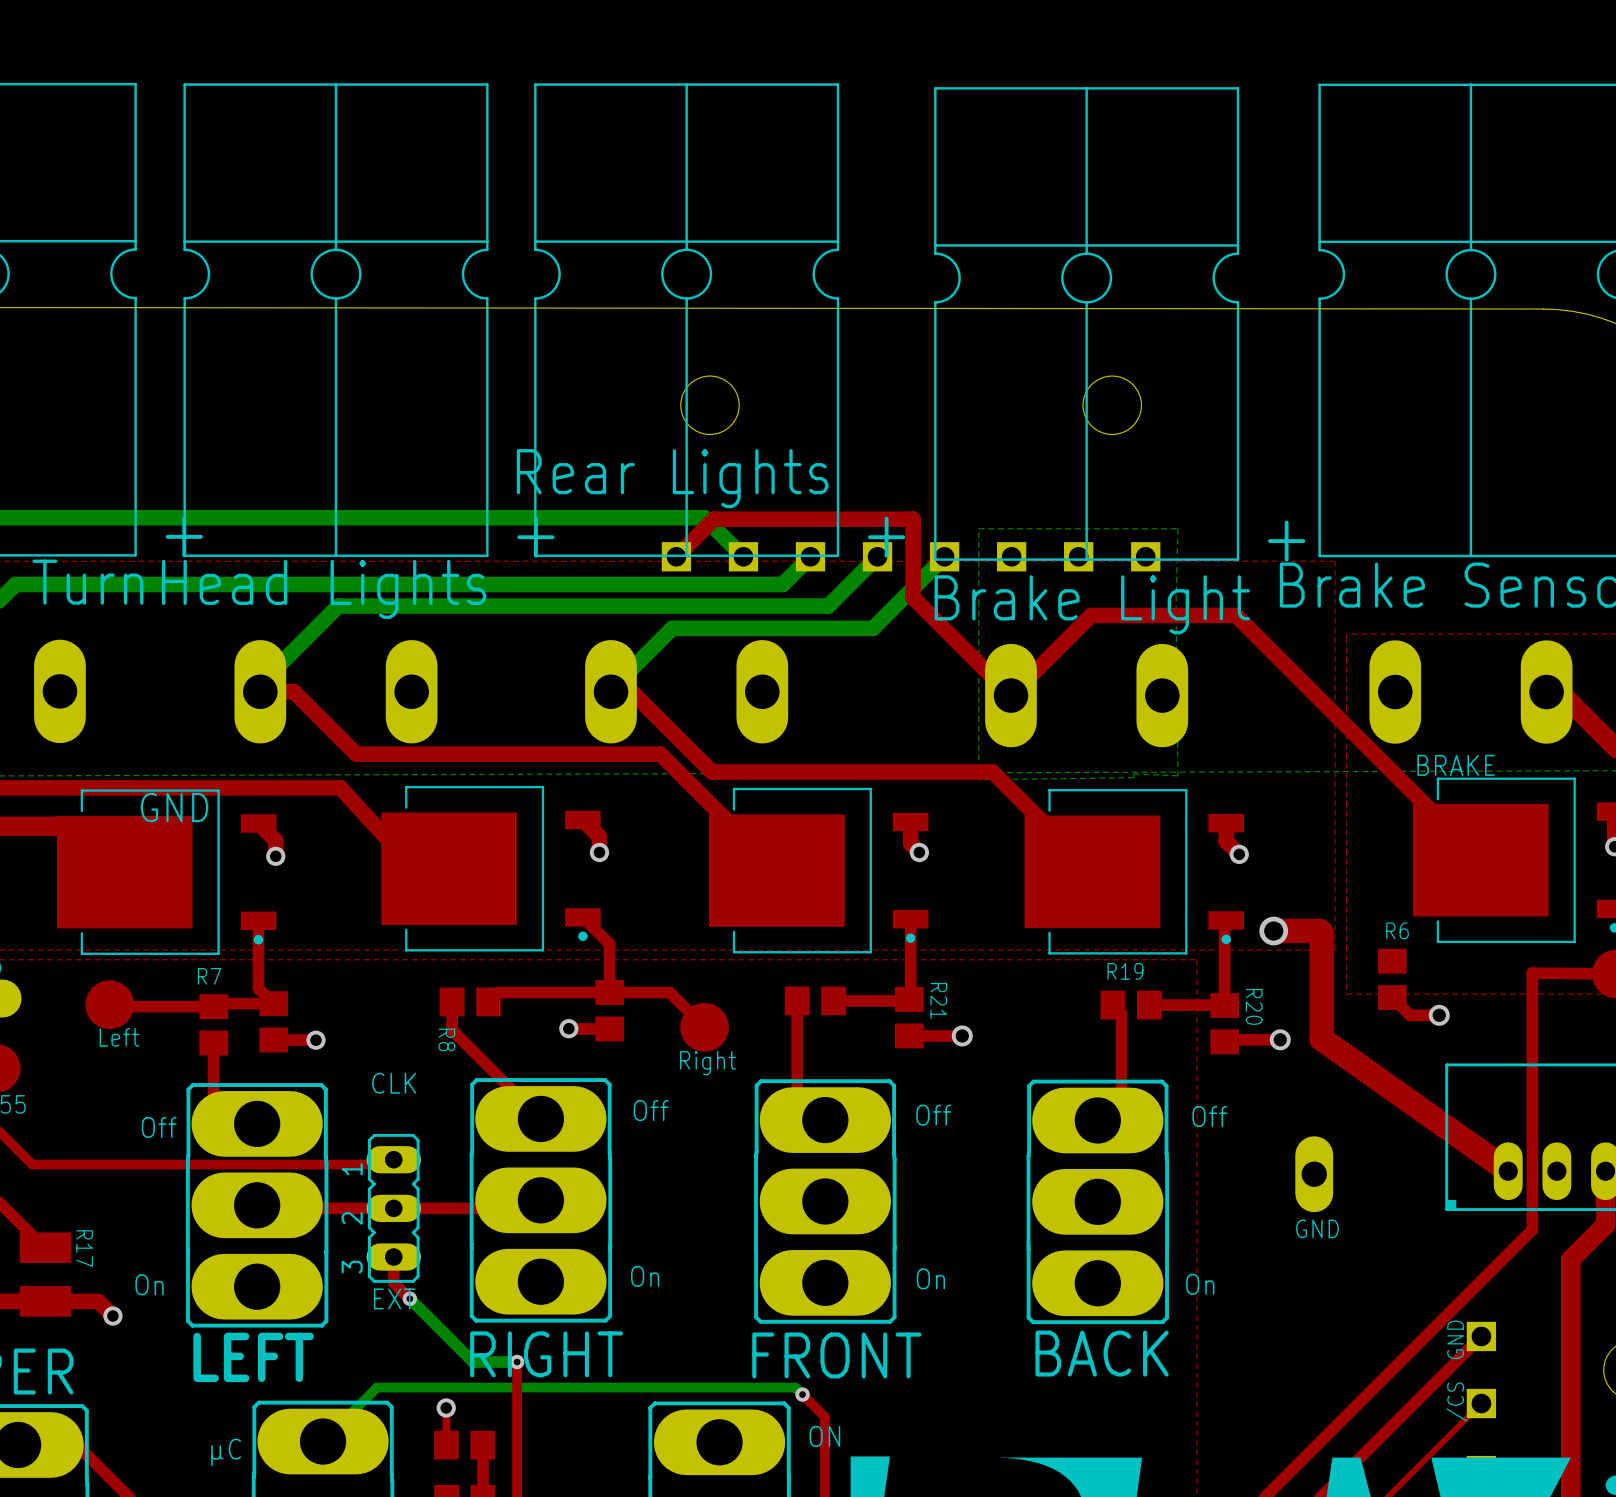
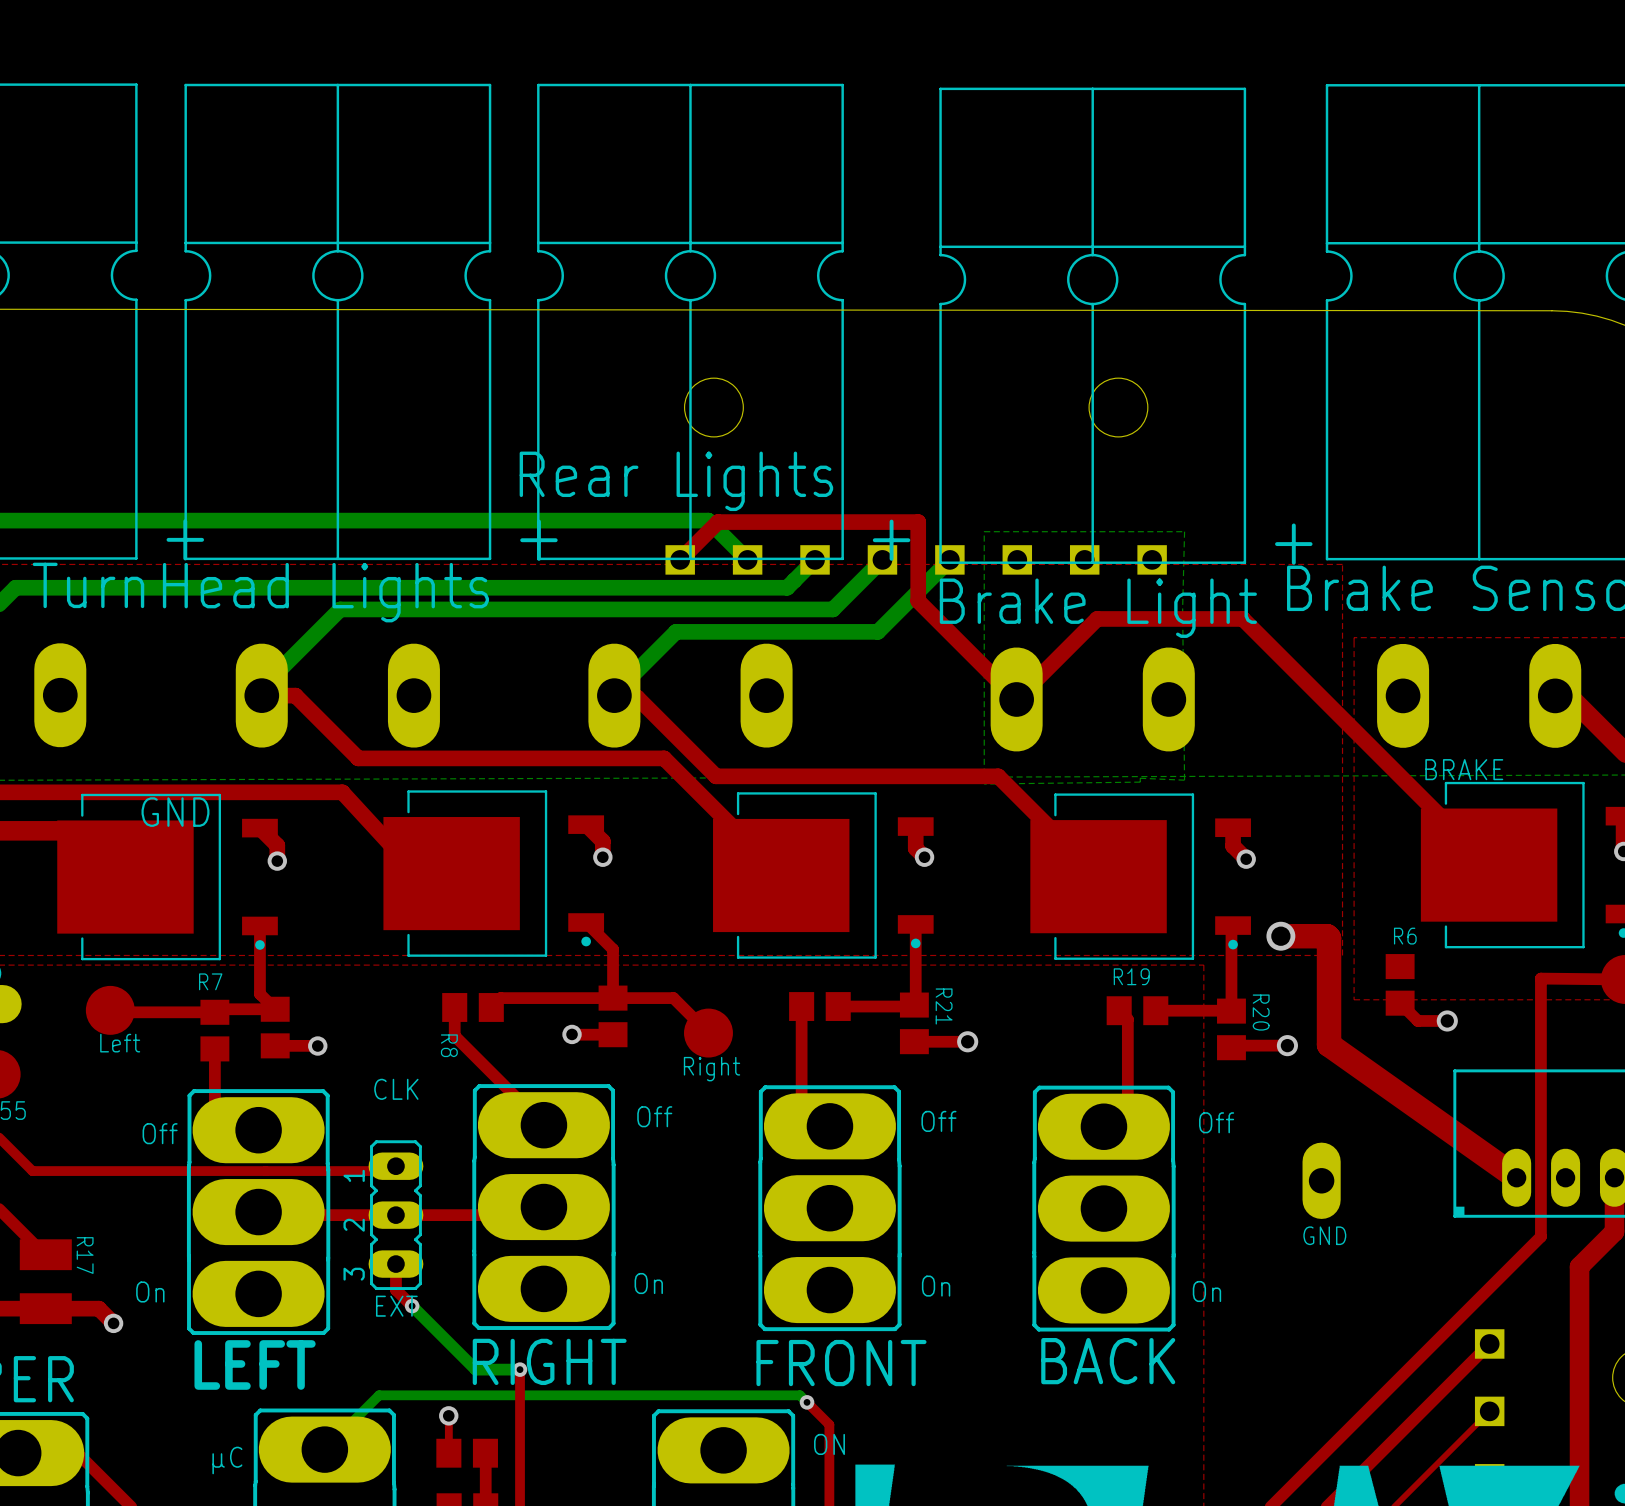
text: GND (1455, 1339) -> none
text: /CS (1457, 1402) -> none

